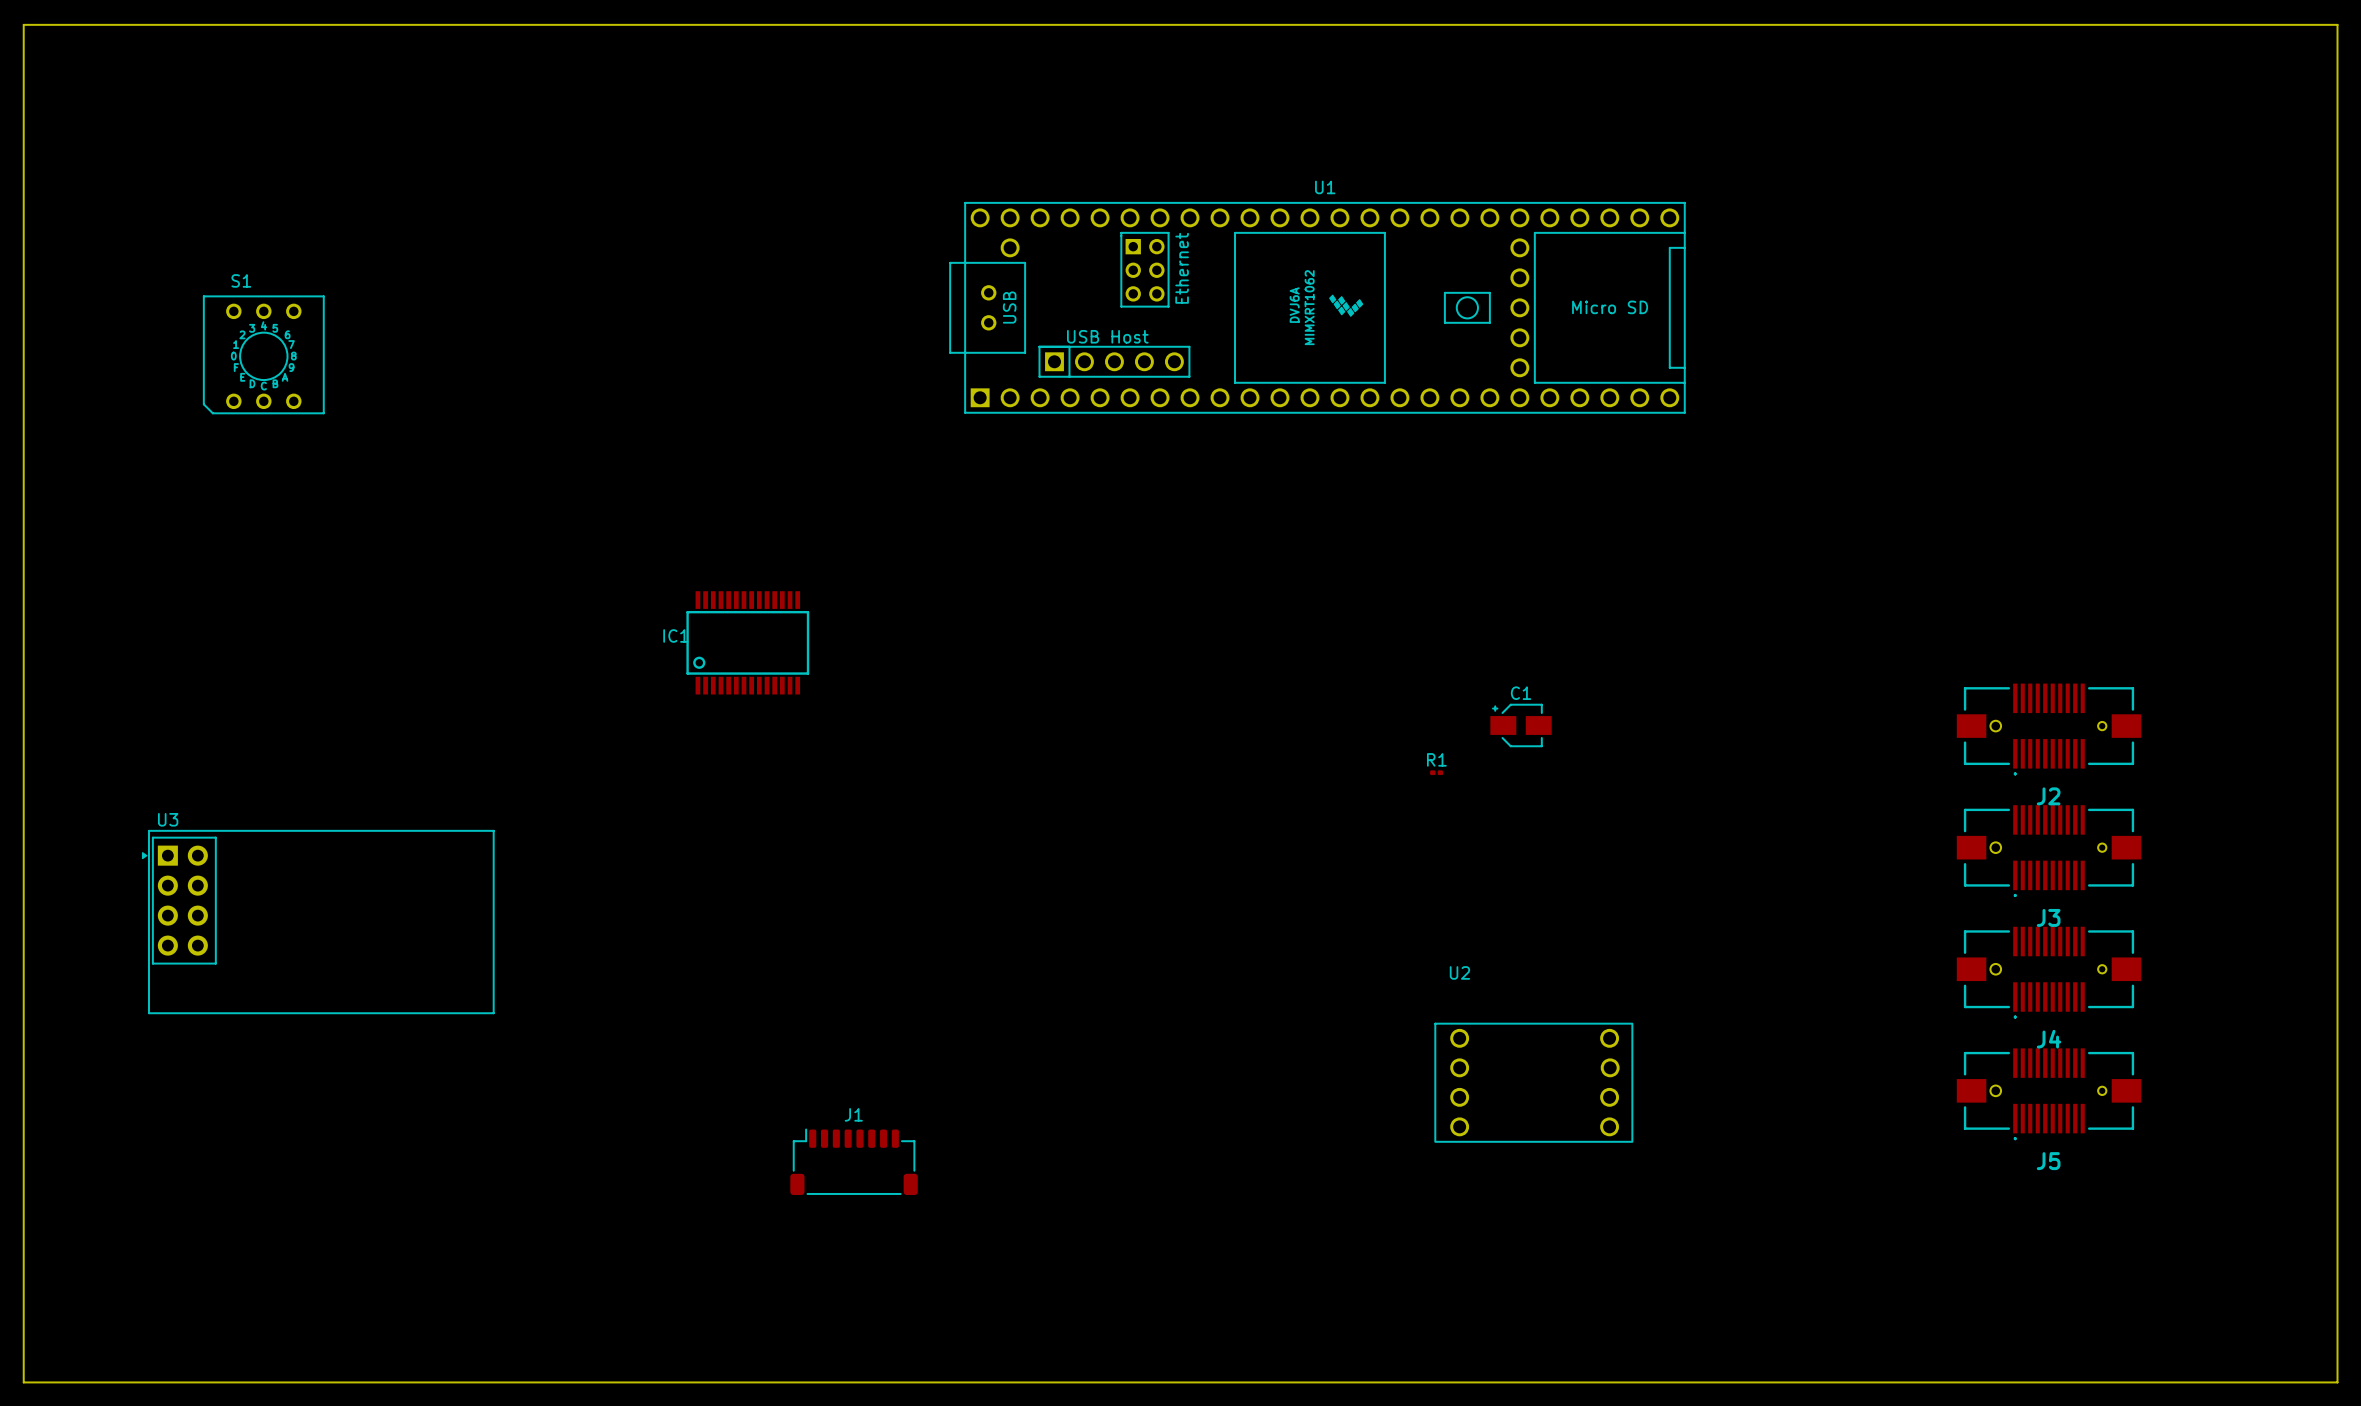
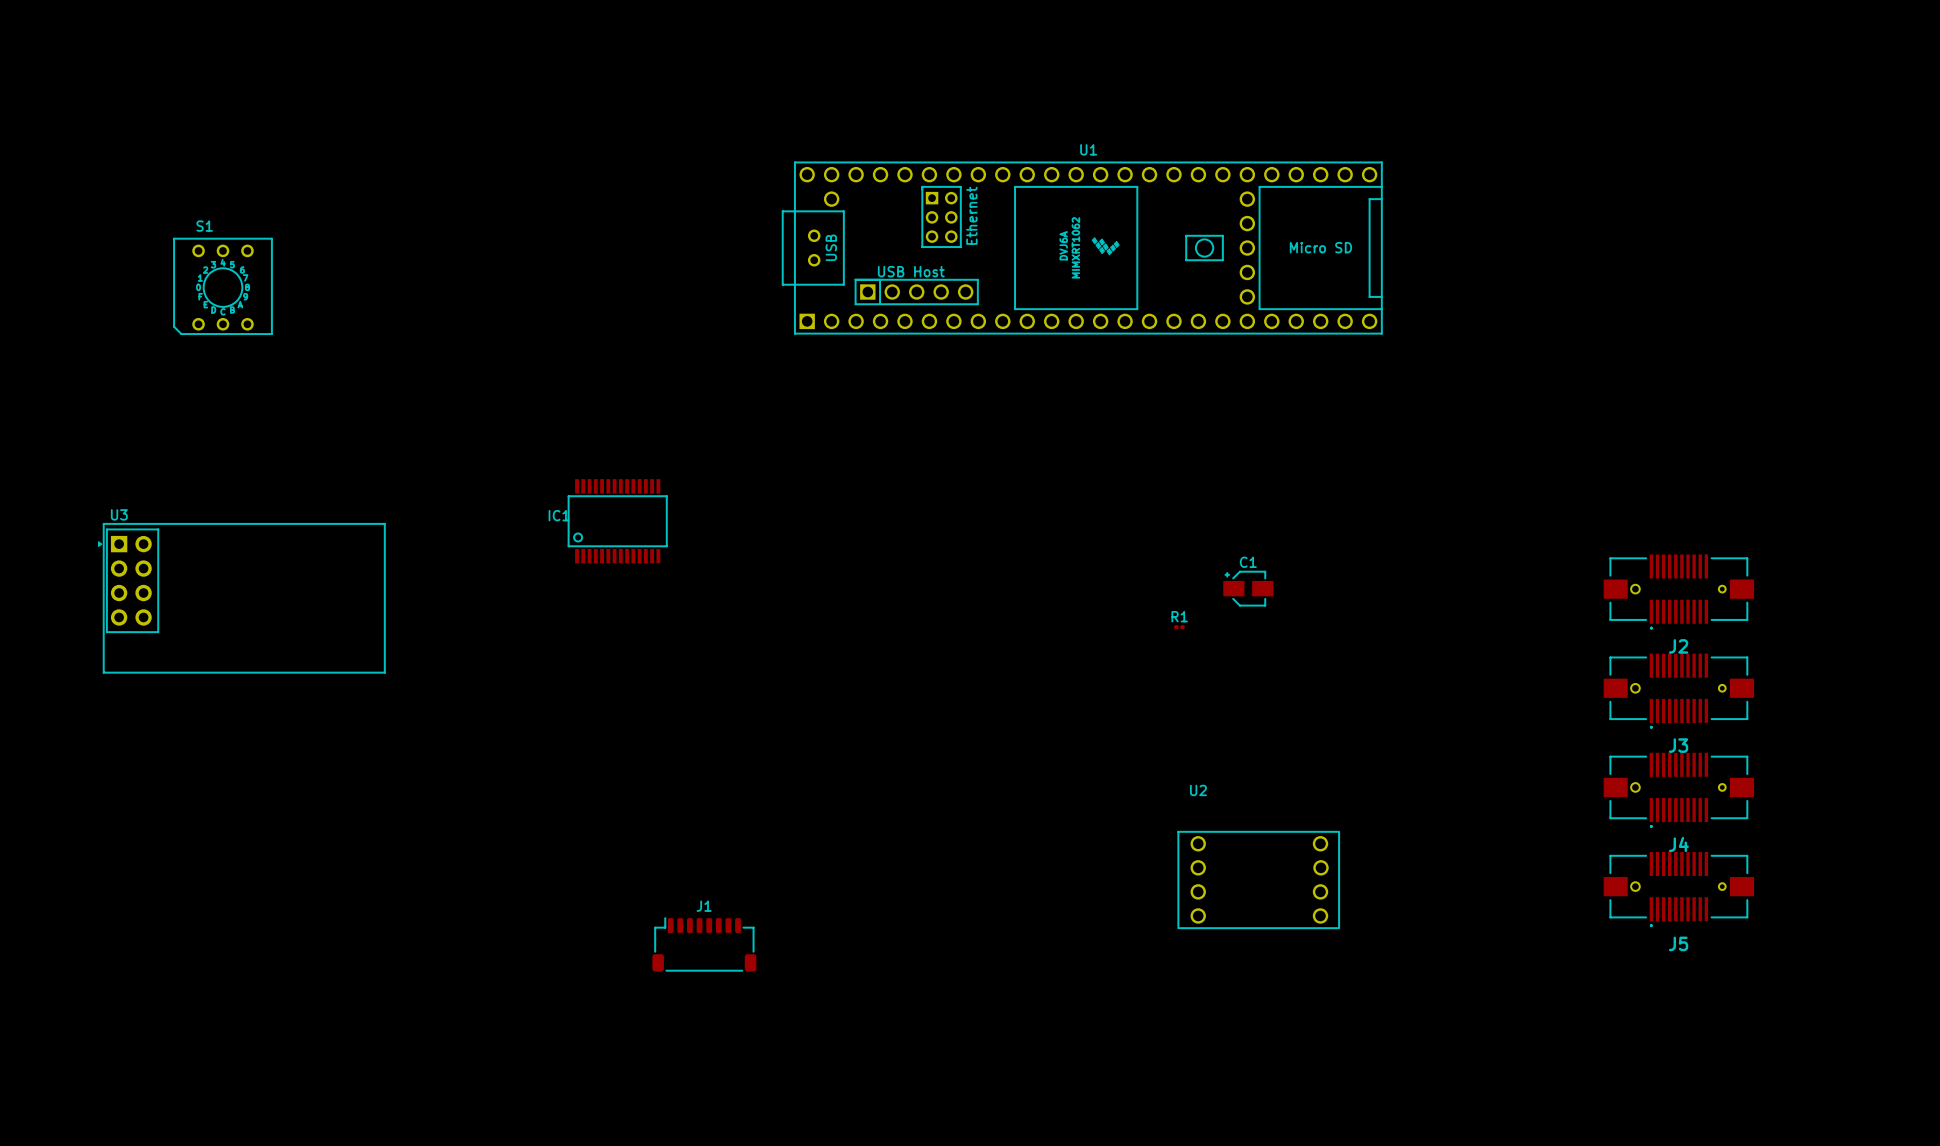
board edge: (23, 24) (2337, 24) (2337, 1382) (23, 1382) (23, 24) -> none
U3 position: (318, 922) -> (241, 598)

